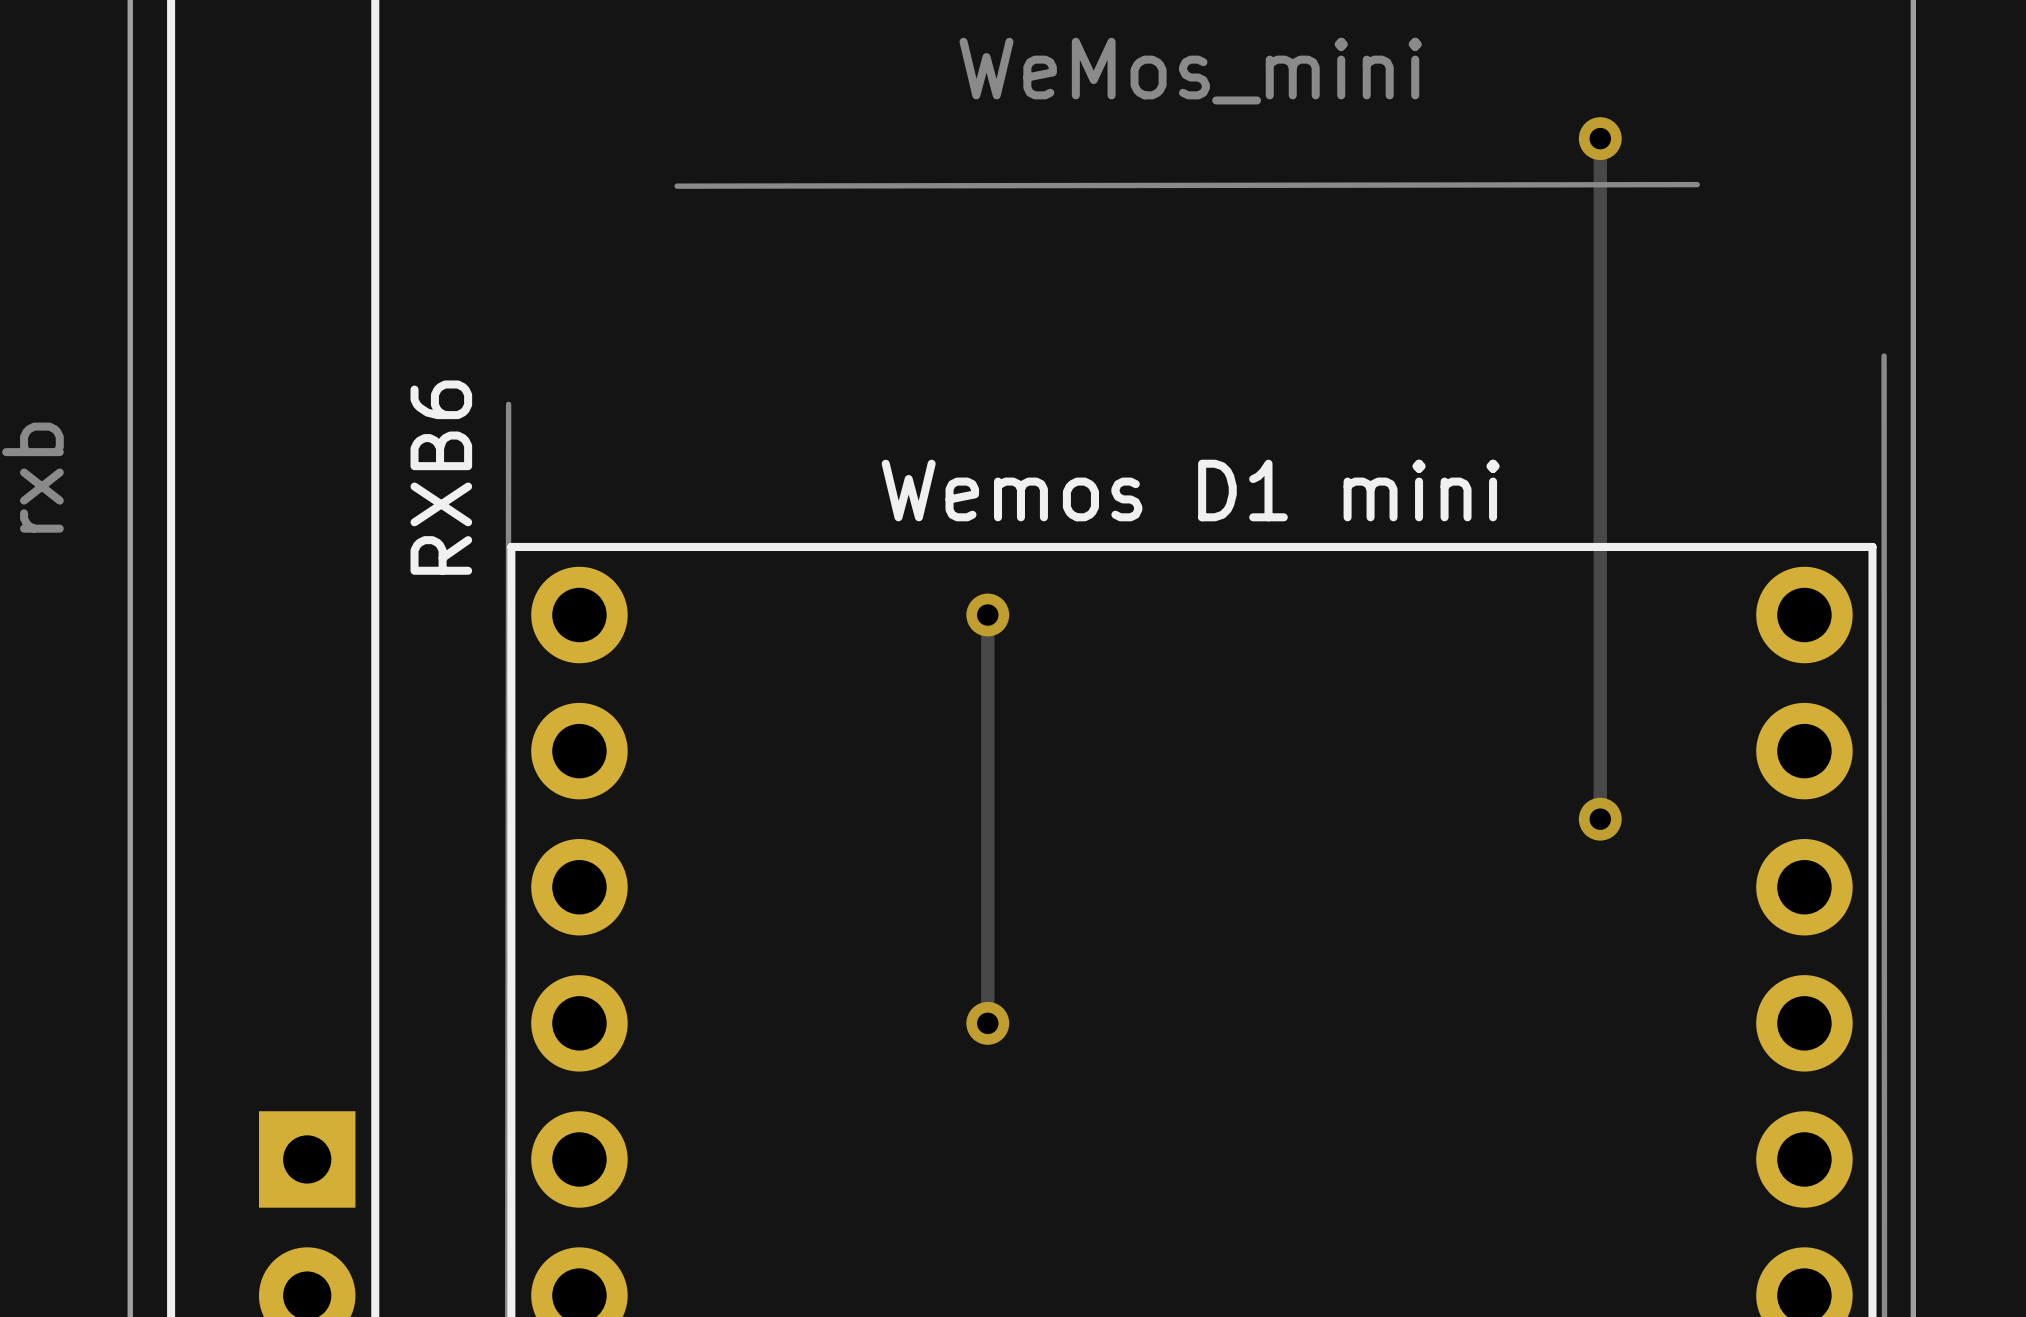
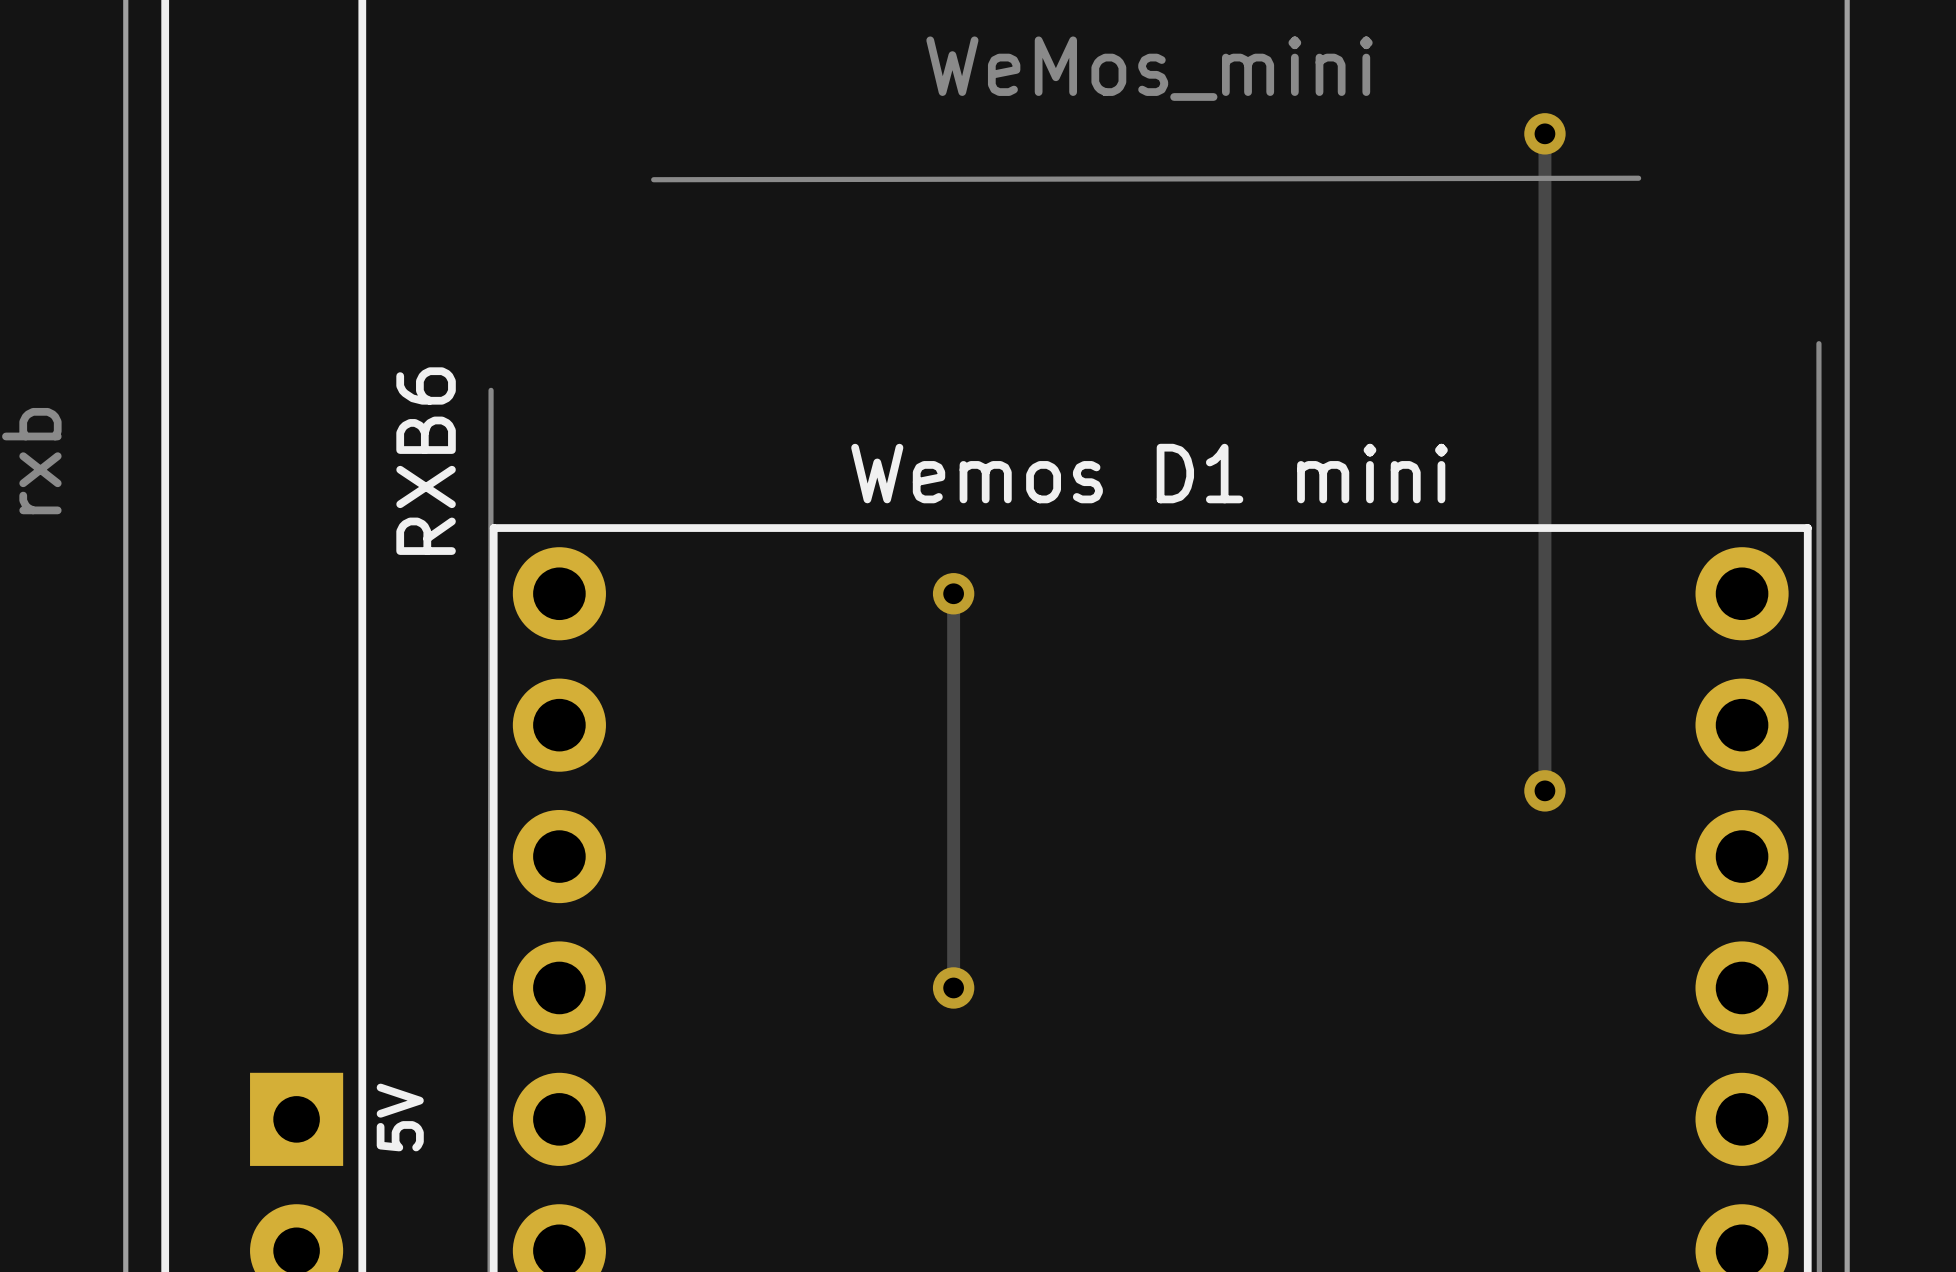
text: none -> 5V (400, 1117)

